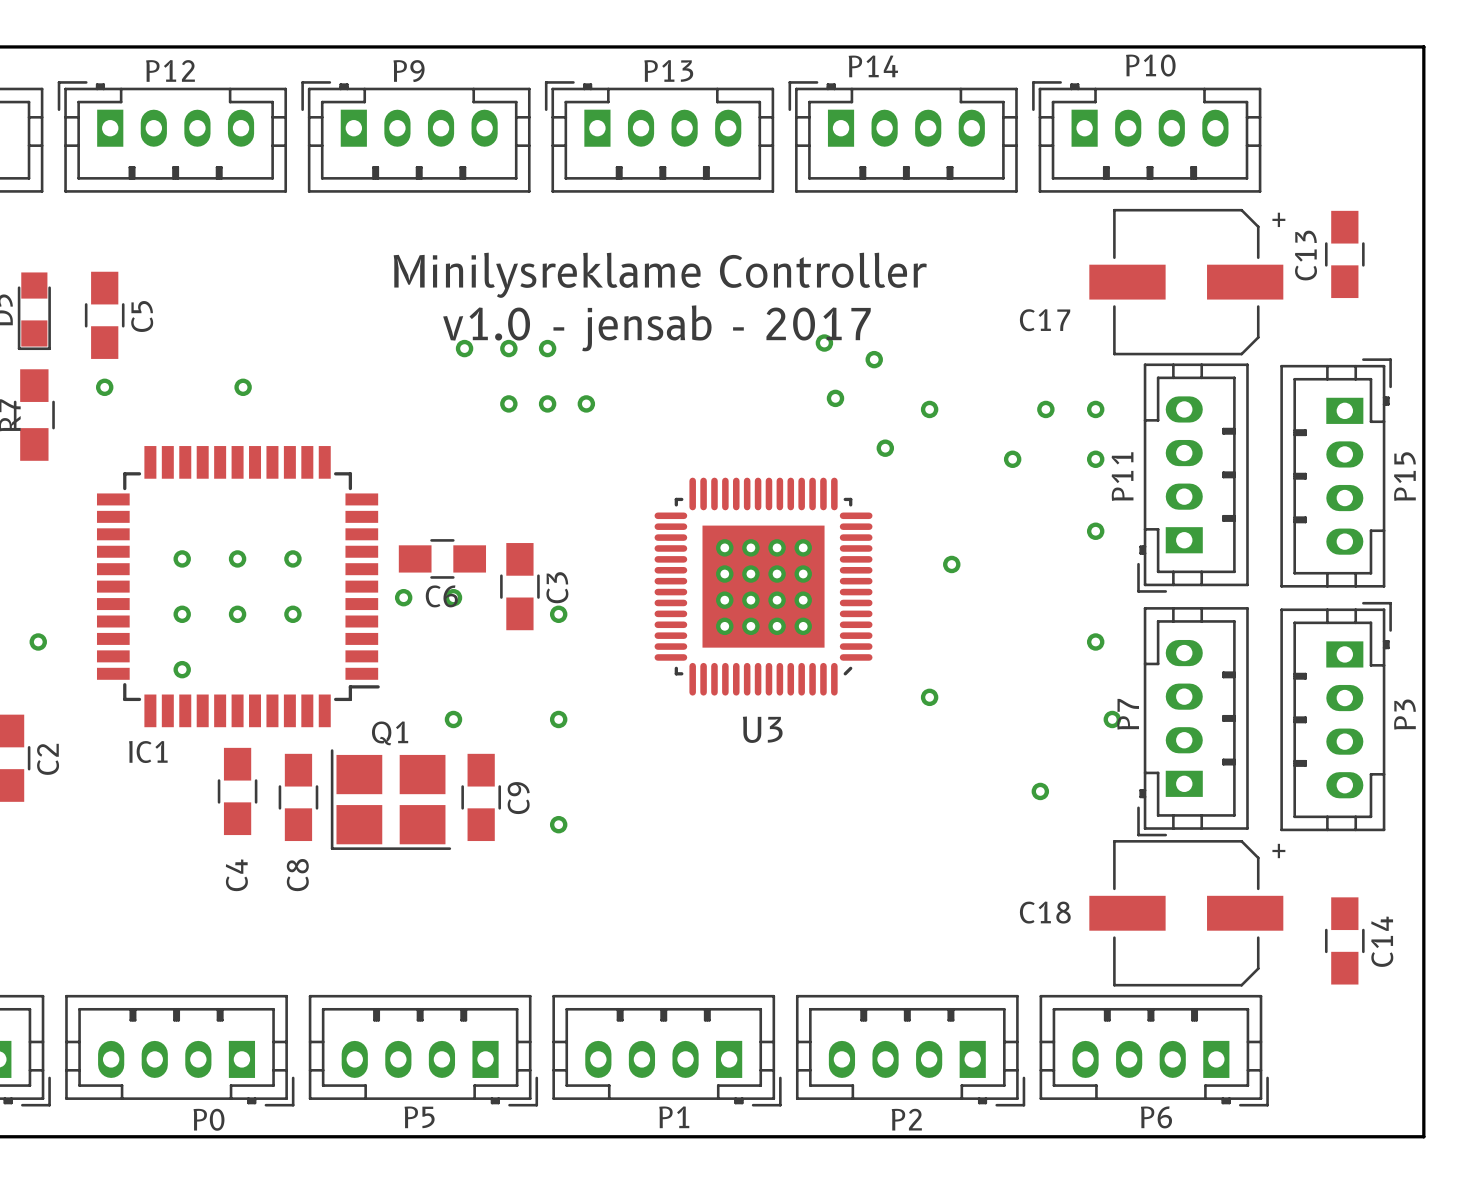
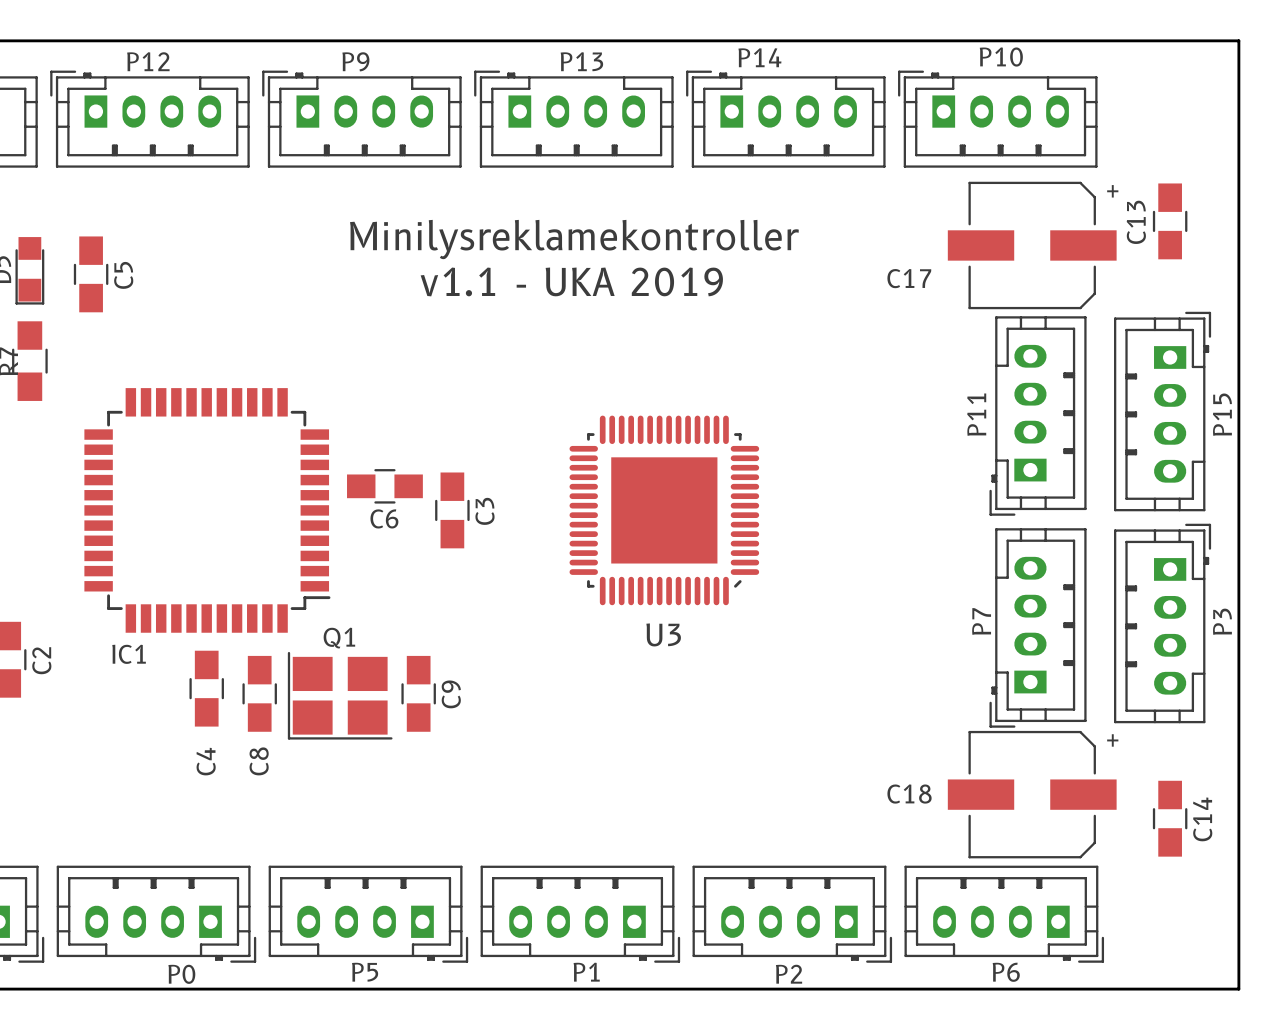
text: Minilysreklame Controller (660, 275) -> Minilysreklamekontroller (574, 239)
text: v1.0 - jensab - 2017 (656, 328) -> v1.1 - UKA 2019 (571, 281)
part: (824, 343) -> none
part: (464, 348) -> none
part: (508, 348) -> none
part: (547, 348) -> none
part: (874, 359) -> none
part: (104, 387) -> none
part: (243, 387) -> none
part: (835, 398) -> none
part: (508, 403) -> none
part: (547, 403) -> none
part: (586, 403) -> none
part: (929, 409) -> none
part: (1045, 409) -> none
part: (1095, 409) -> none
part: (885, 448) -> none
part: (1012, 459) -> none
part: (1095, 459) -> none
part: (1095, 531) -> none
part: (724, 547) -> none
part: (750, 547) -> none
part: (777, 547) -> none
part: (803, 547) -> none
part: (182, 558) -> none
part: (237, 558) -> none
part: (292, 558) -> none
part: (951, 564) -> none
part: (724, 574) -> none
part: (750, 574) -> none
part: (777, 574) -> none
part: (803, 574) -> none
part: (403, 597) -> none
part: (453, 597) -> none
part: (724, 600) -> none
part: (750, 600) -> none
part: (777, 600) -> none
part: (803, 600) -> none
part: (182, 614) -> none
part: (237, 614) -> none
part: (292, 614) -> none
part: (558, 614) -> none
part: (724, 626) -> none
part: (750, 626) -> none
part: (777, 626) -> none
part: (803, 626) -> none
part: (38, 641) -> none
part: (1095, 641) -> none
part: (182, 669) -> none
part: (929, 697) -> none
part: (453, 719) -> none
part: (558, 719) -> none
part: (1112, 719) -> none
part: (1040, 791) -> none
part: (558, 824) -> none

